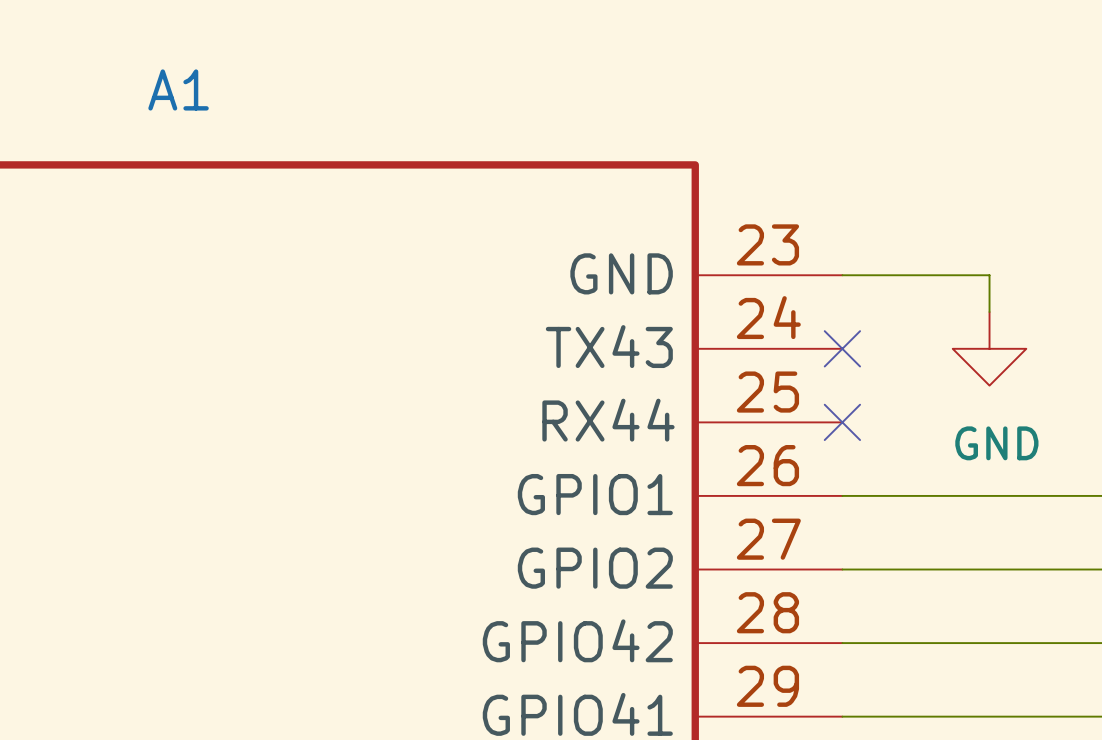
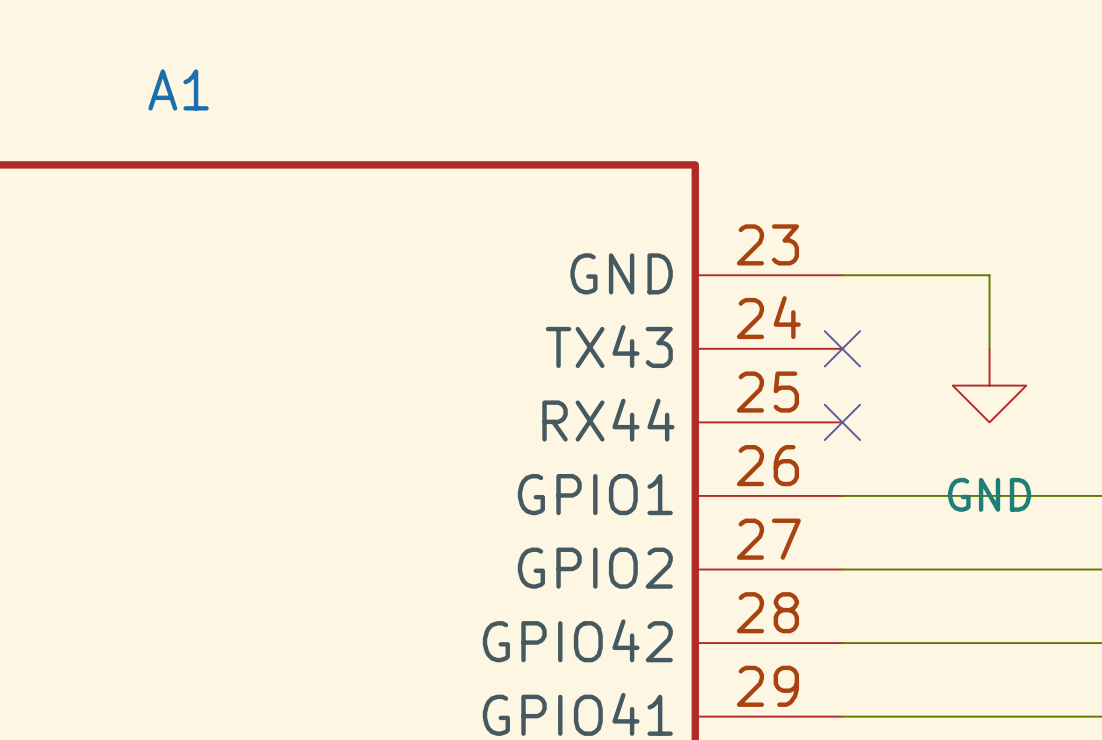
power symbol position: GND (989, 348) -> GND (989, 385)
power symbol text position: GND (996, 443) -> GND (989, 494)

